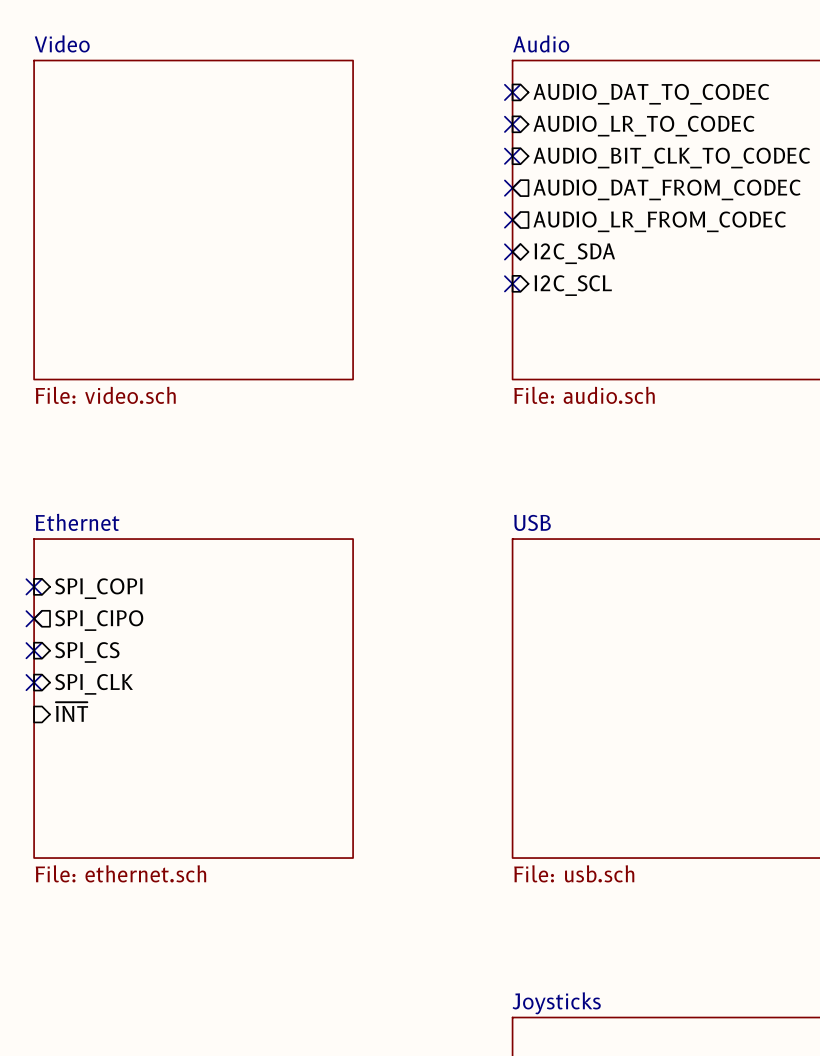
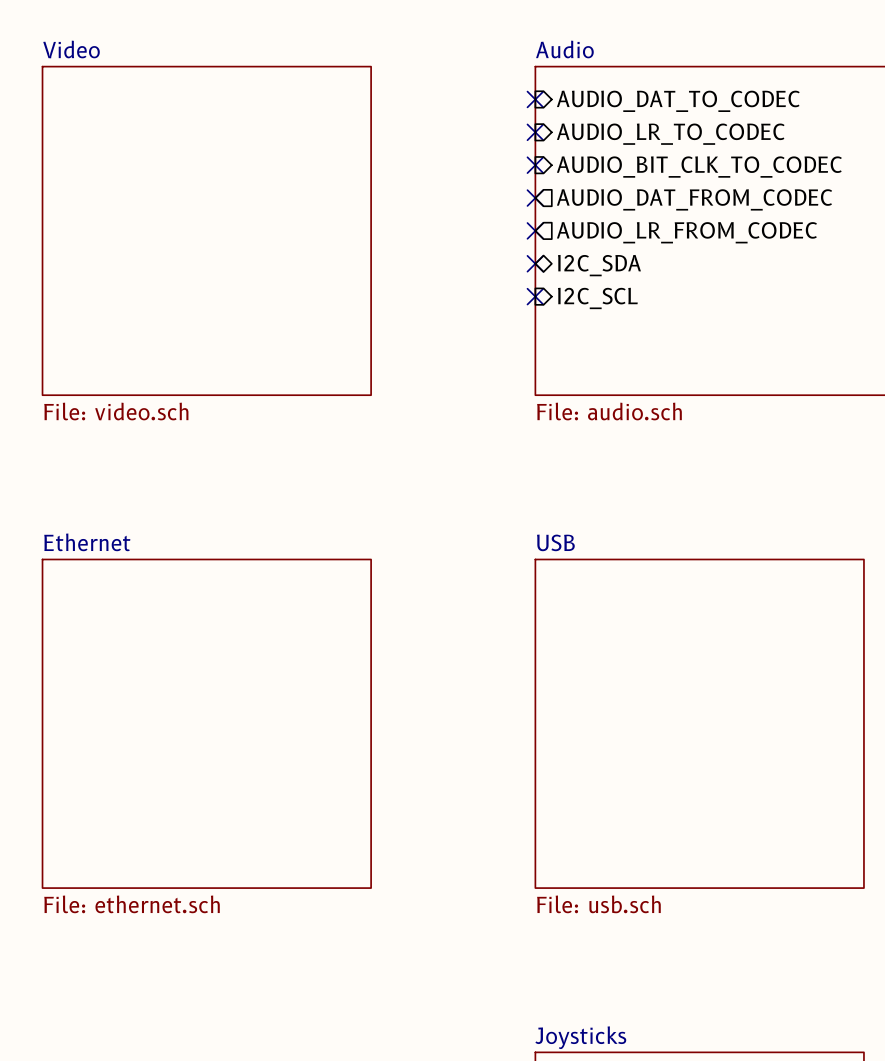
no-connect mark: (34, 586) -> none
sheet pin: SPI_COPI (98, 588) -> none
no-connect mark: (34, 618) -> none
sheet pin: SPI_CIPO (99, 620) -> none
no-connect mark: (34, 650) -> none
sheet pin: SPI_CS (87, 652) -> none
no-connect mark: (34, 682) -> none
sheet pin: SPI_CLK (94, 684) -> none
sheet pin: ~{INT} (71, 712) -> none

